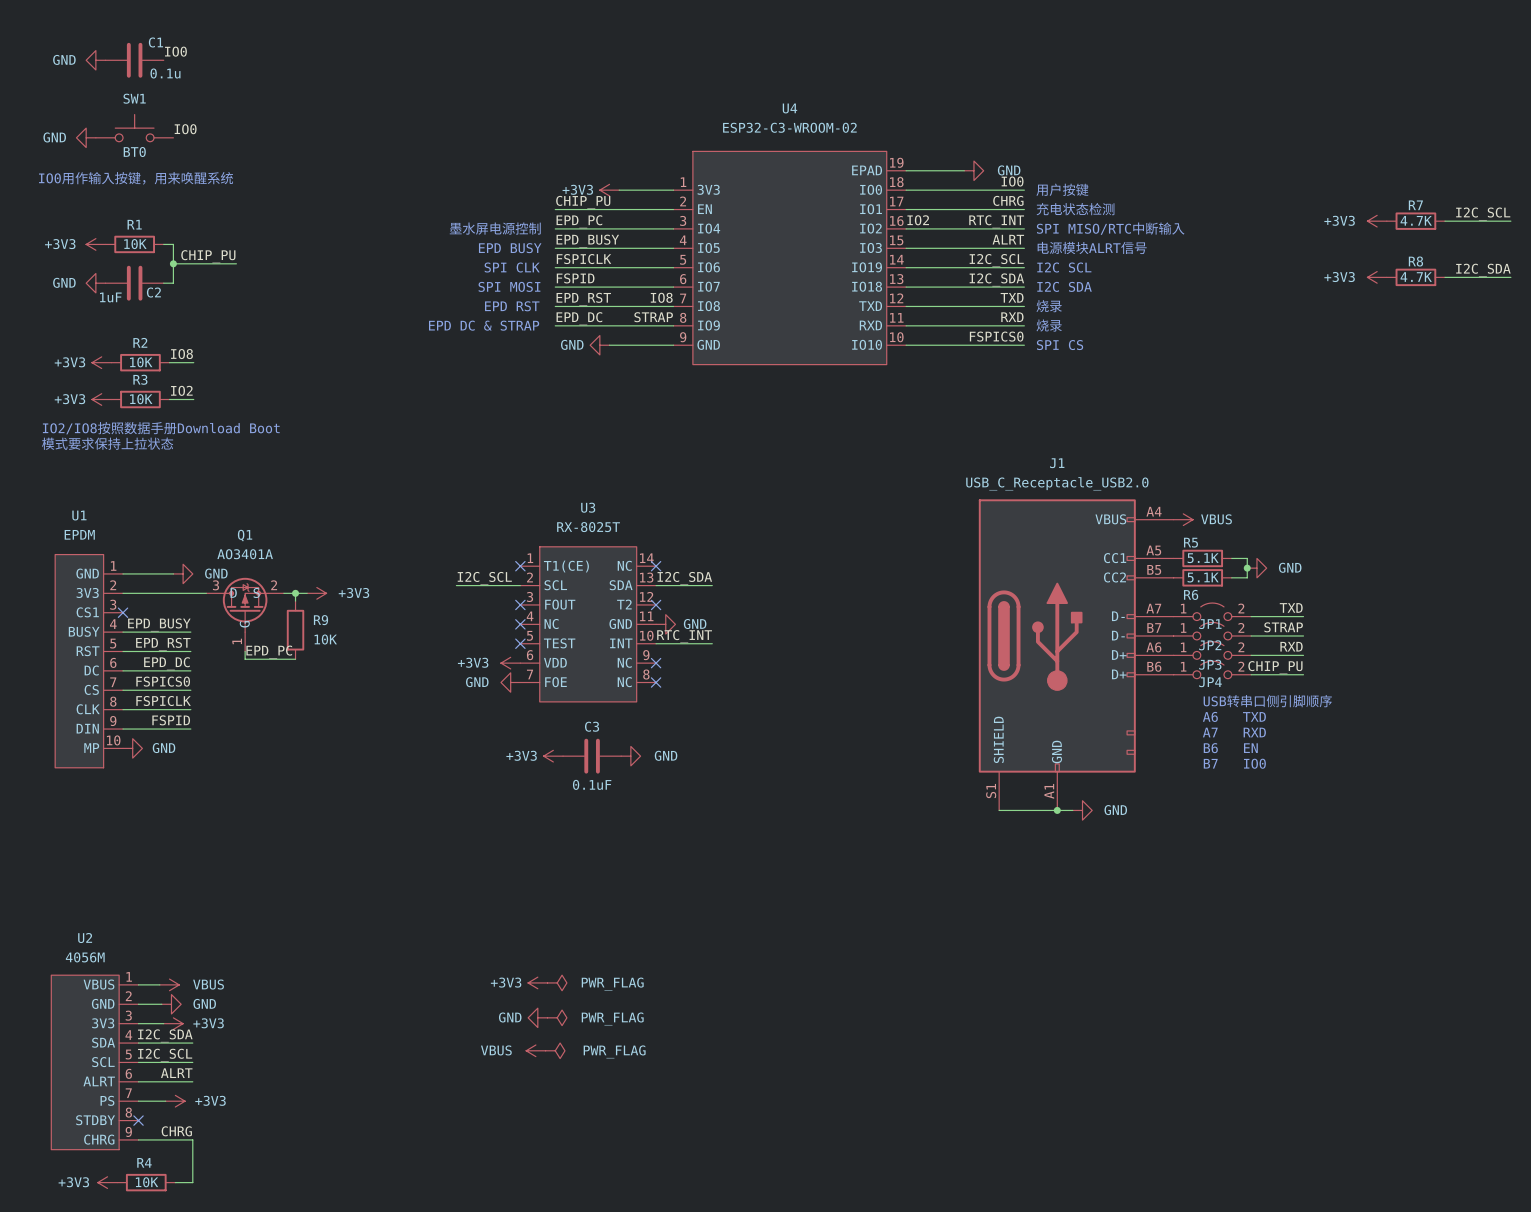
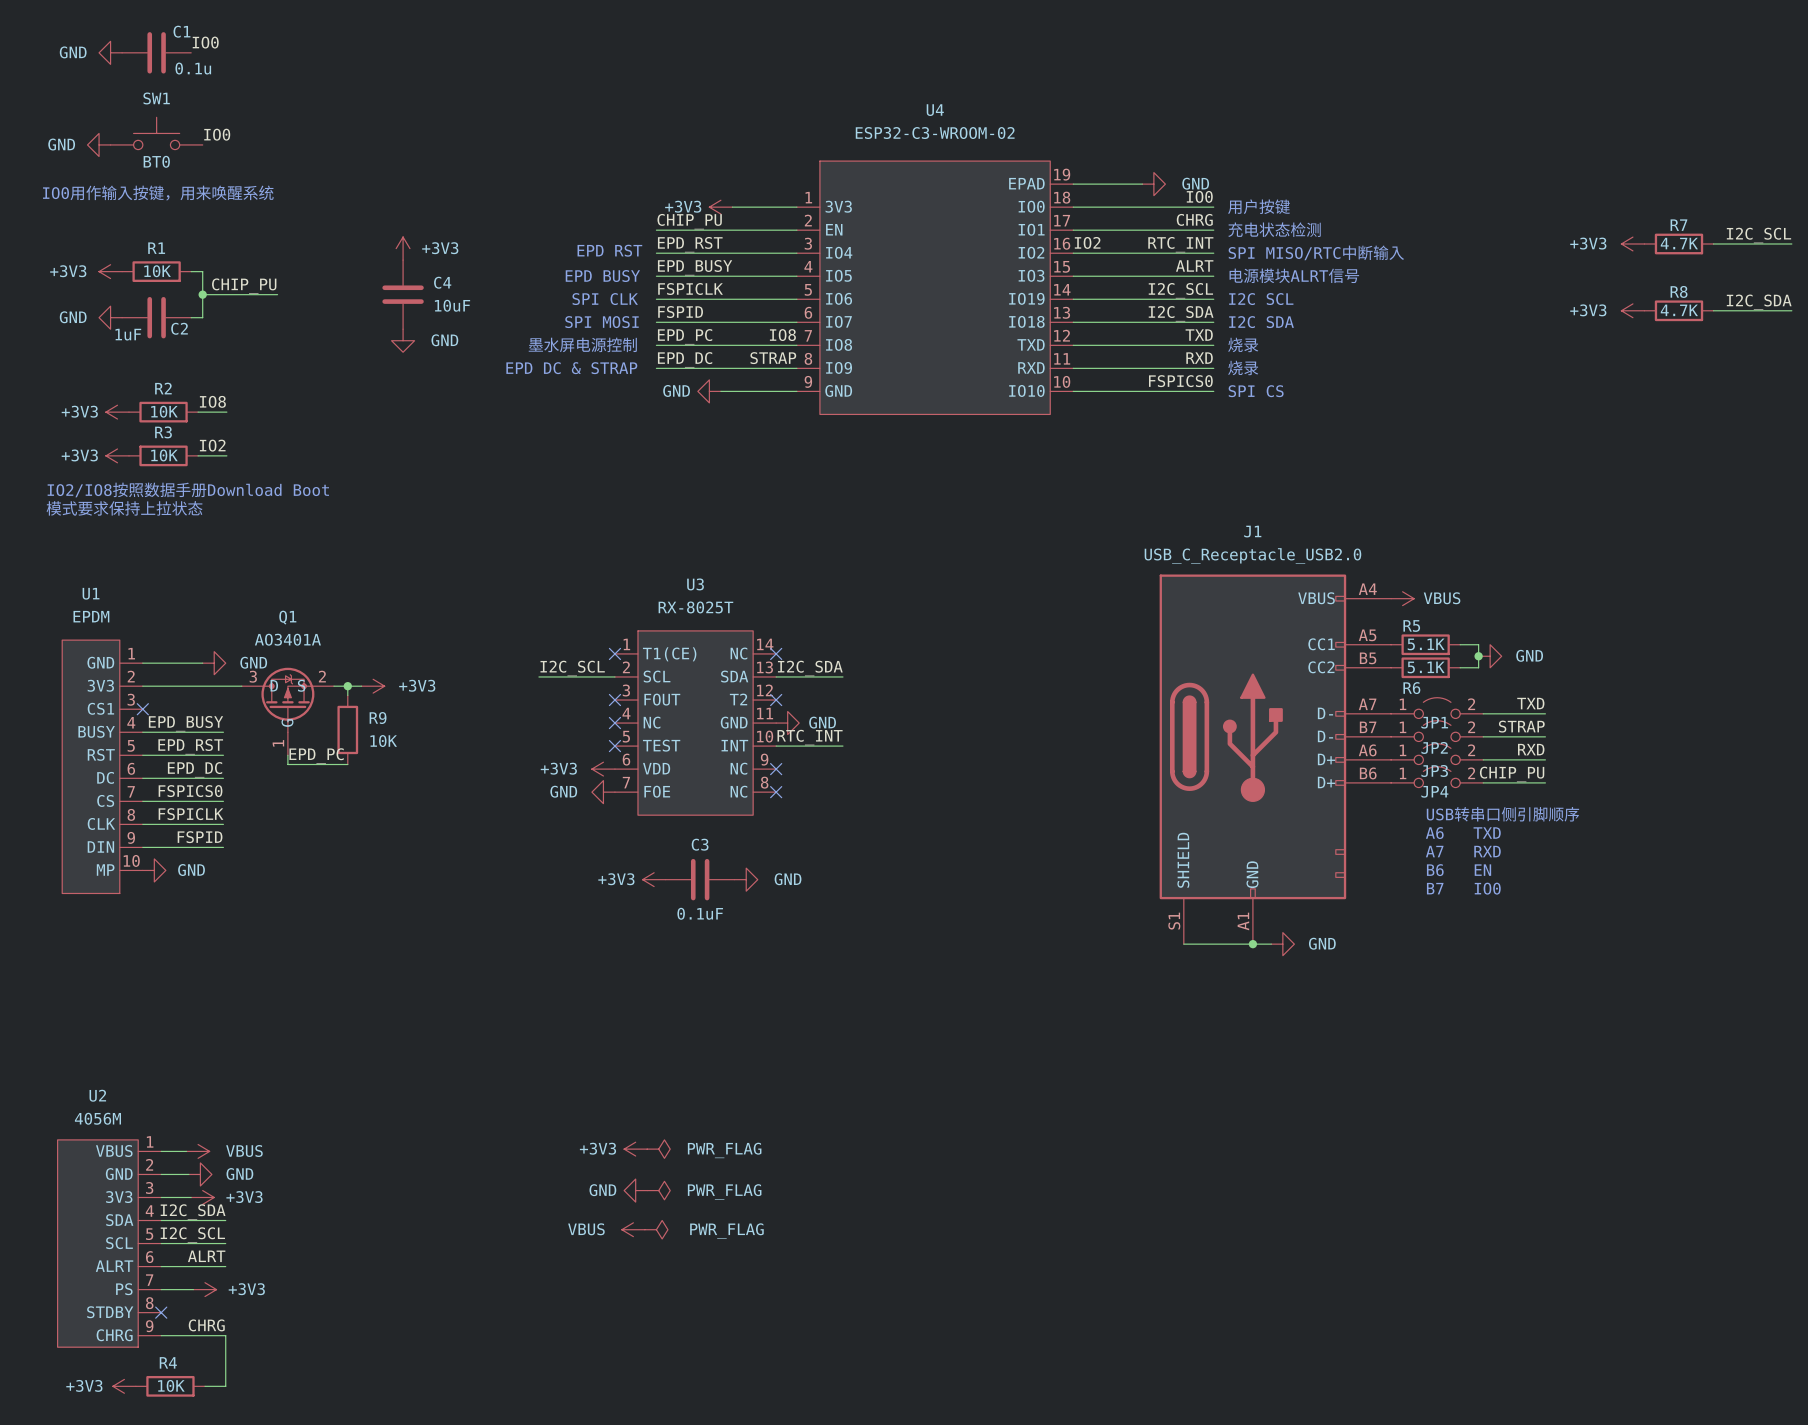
label: EPD_PC (579, 221) -> EPD_RST (690, 244)
power symbol: none -> +3V3 (403, 248)
text: 墨水屏电源控制 (495, 228) -> EPD RST (609, 250)
C4: none -> 10uF (403, 294)
label: EPD_RST (583, 299) -> EPD_PC (685, 336)
power symbol: none -> GND (403, 340)
text: EPD RST (512, 306) -> 墨水屏电源控制 (582, 344)

